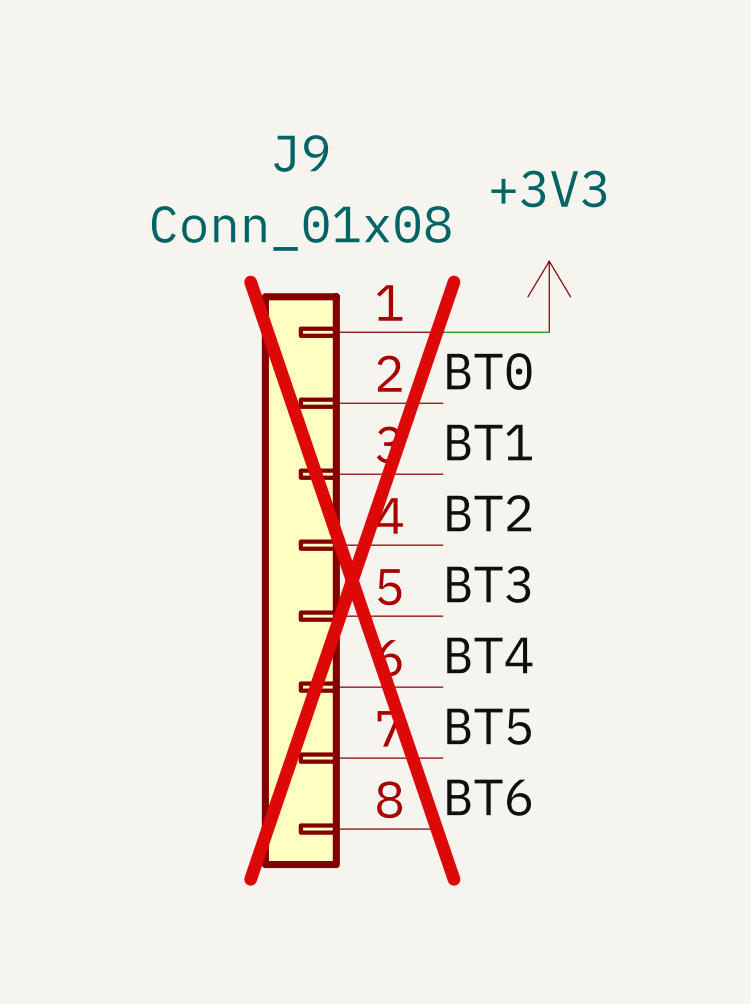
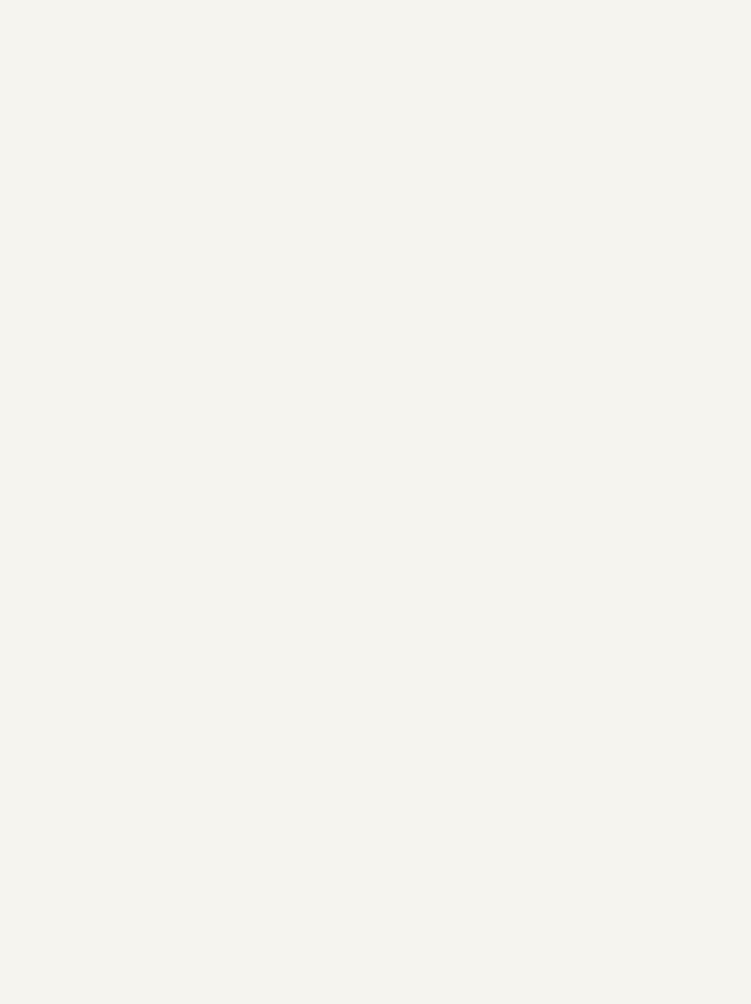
power symbol: +3V3 (549, 296) -> none
wire: (442, 332) (549, 332) -> none
label: BT0 (489, 371) -> none
label: BT1 (489, 442) -> none
label: BT2 (489, 513) -> none
J9: Conn_01x08 (352, 580) -> none
label: BT3 (488, 584) -> none
label: BT4 (489, 655) -> none
label: BT5 (489, 726) -> none
label: BT6 (489, 797) -> none

